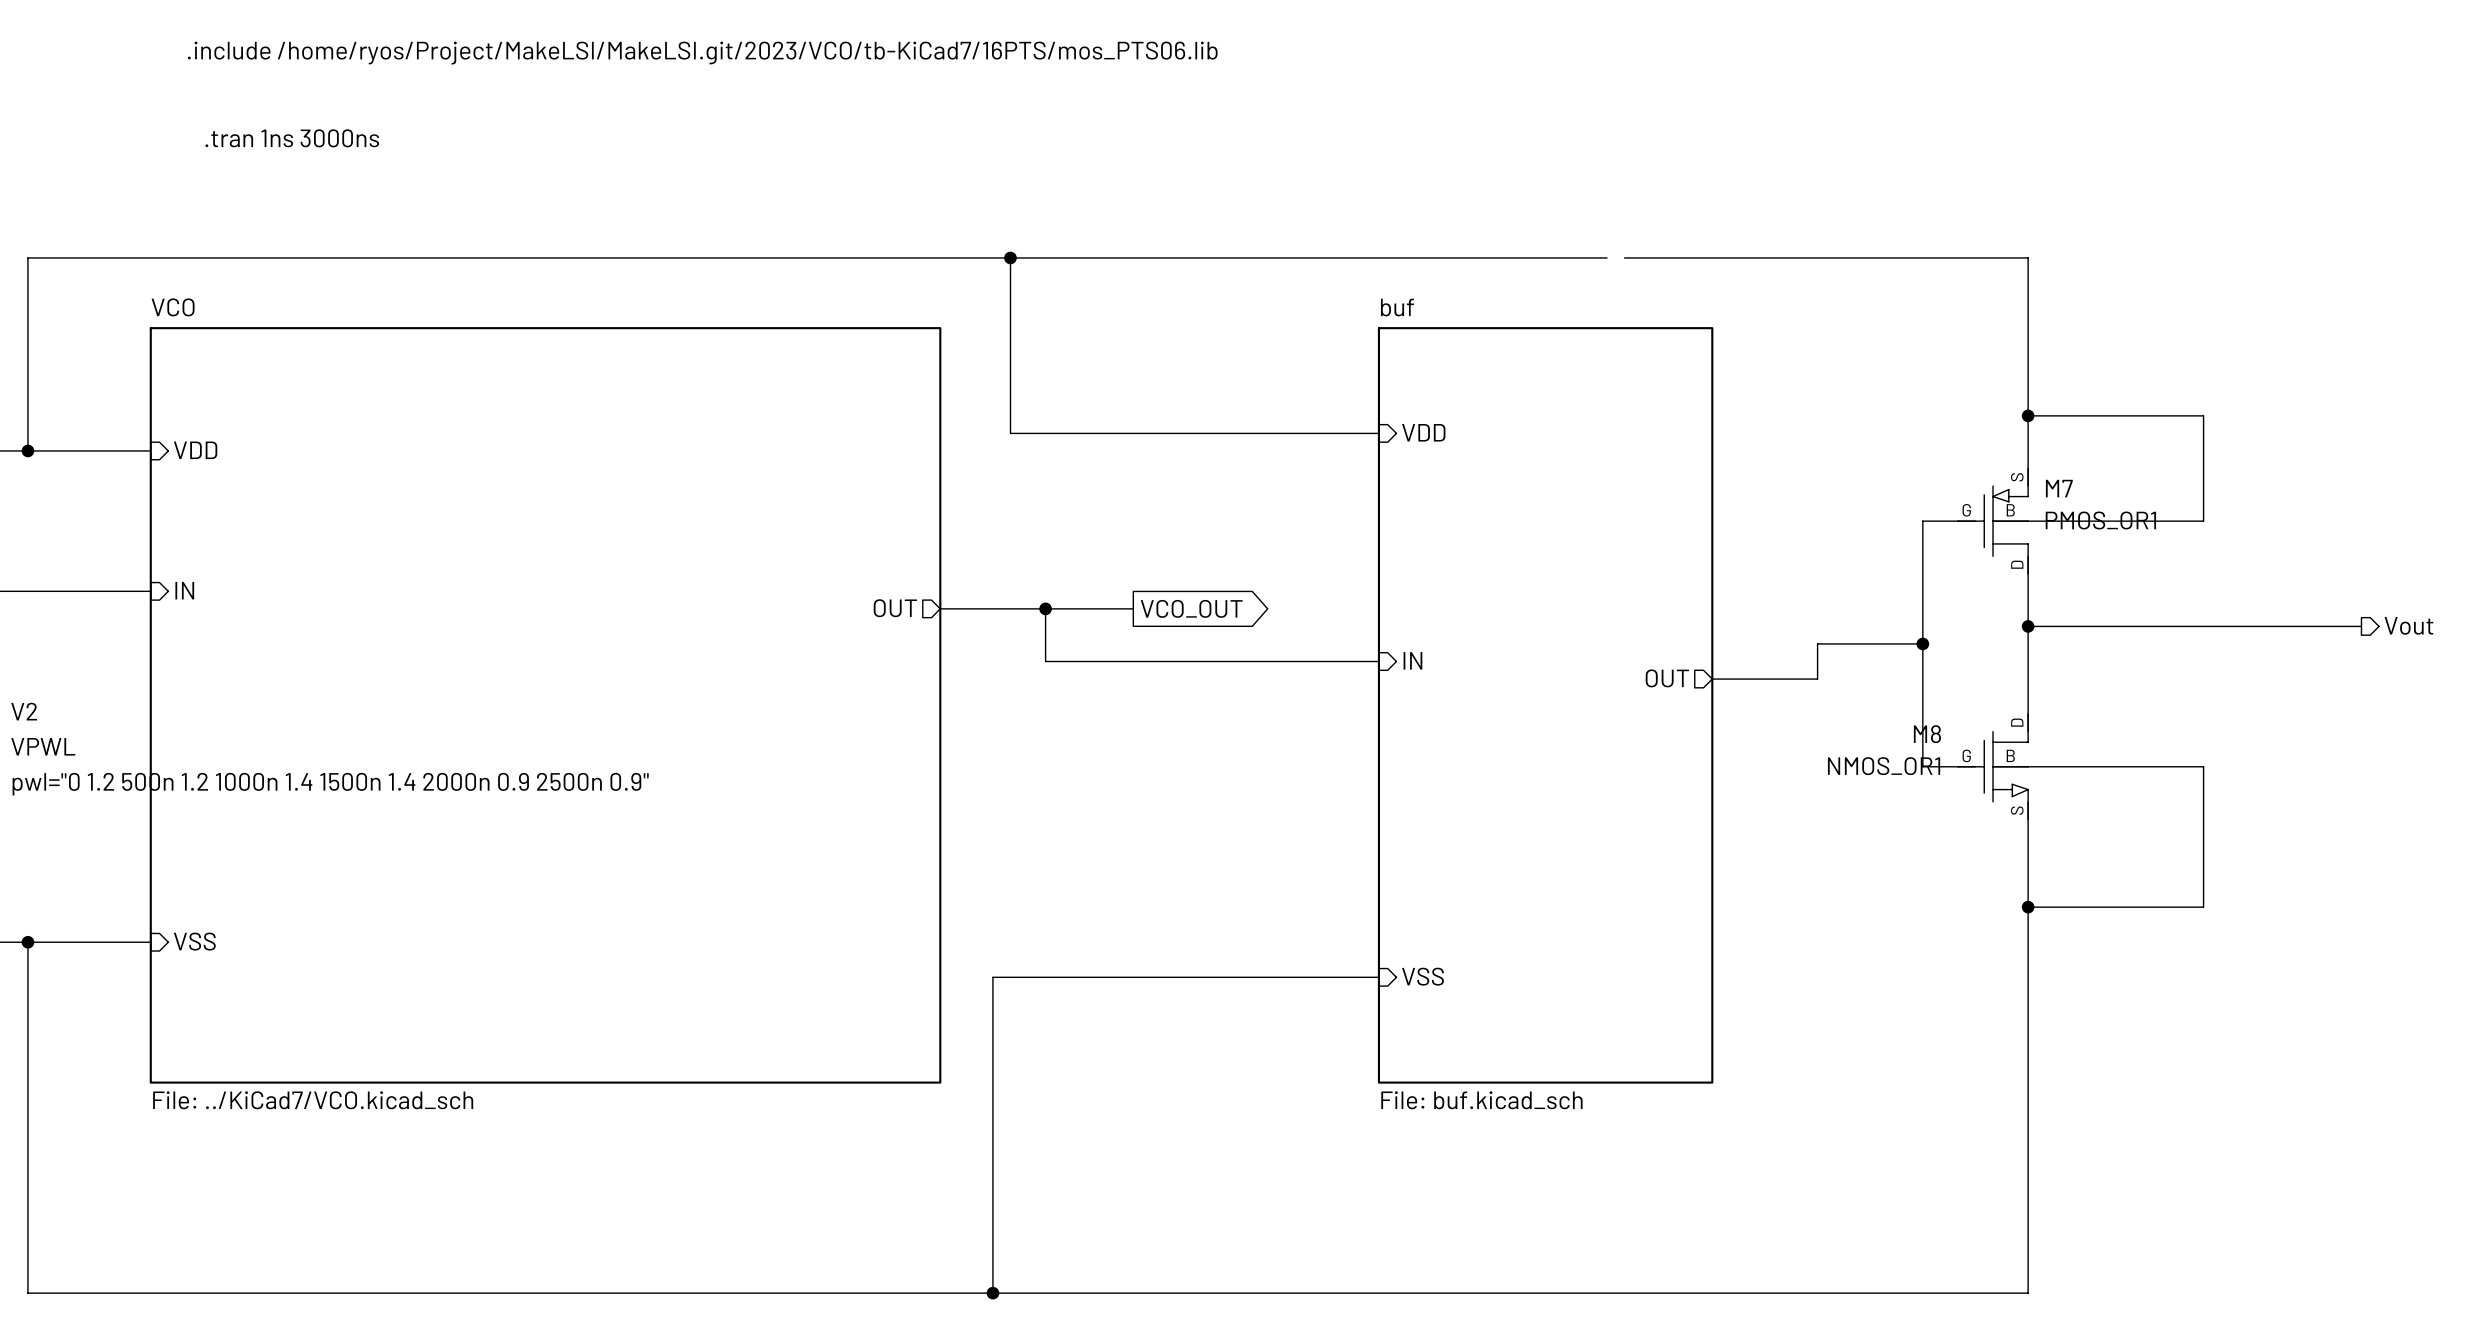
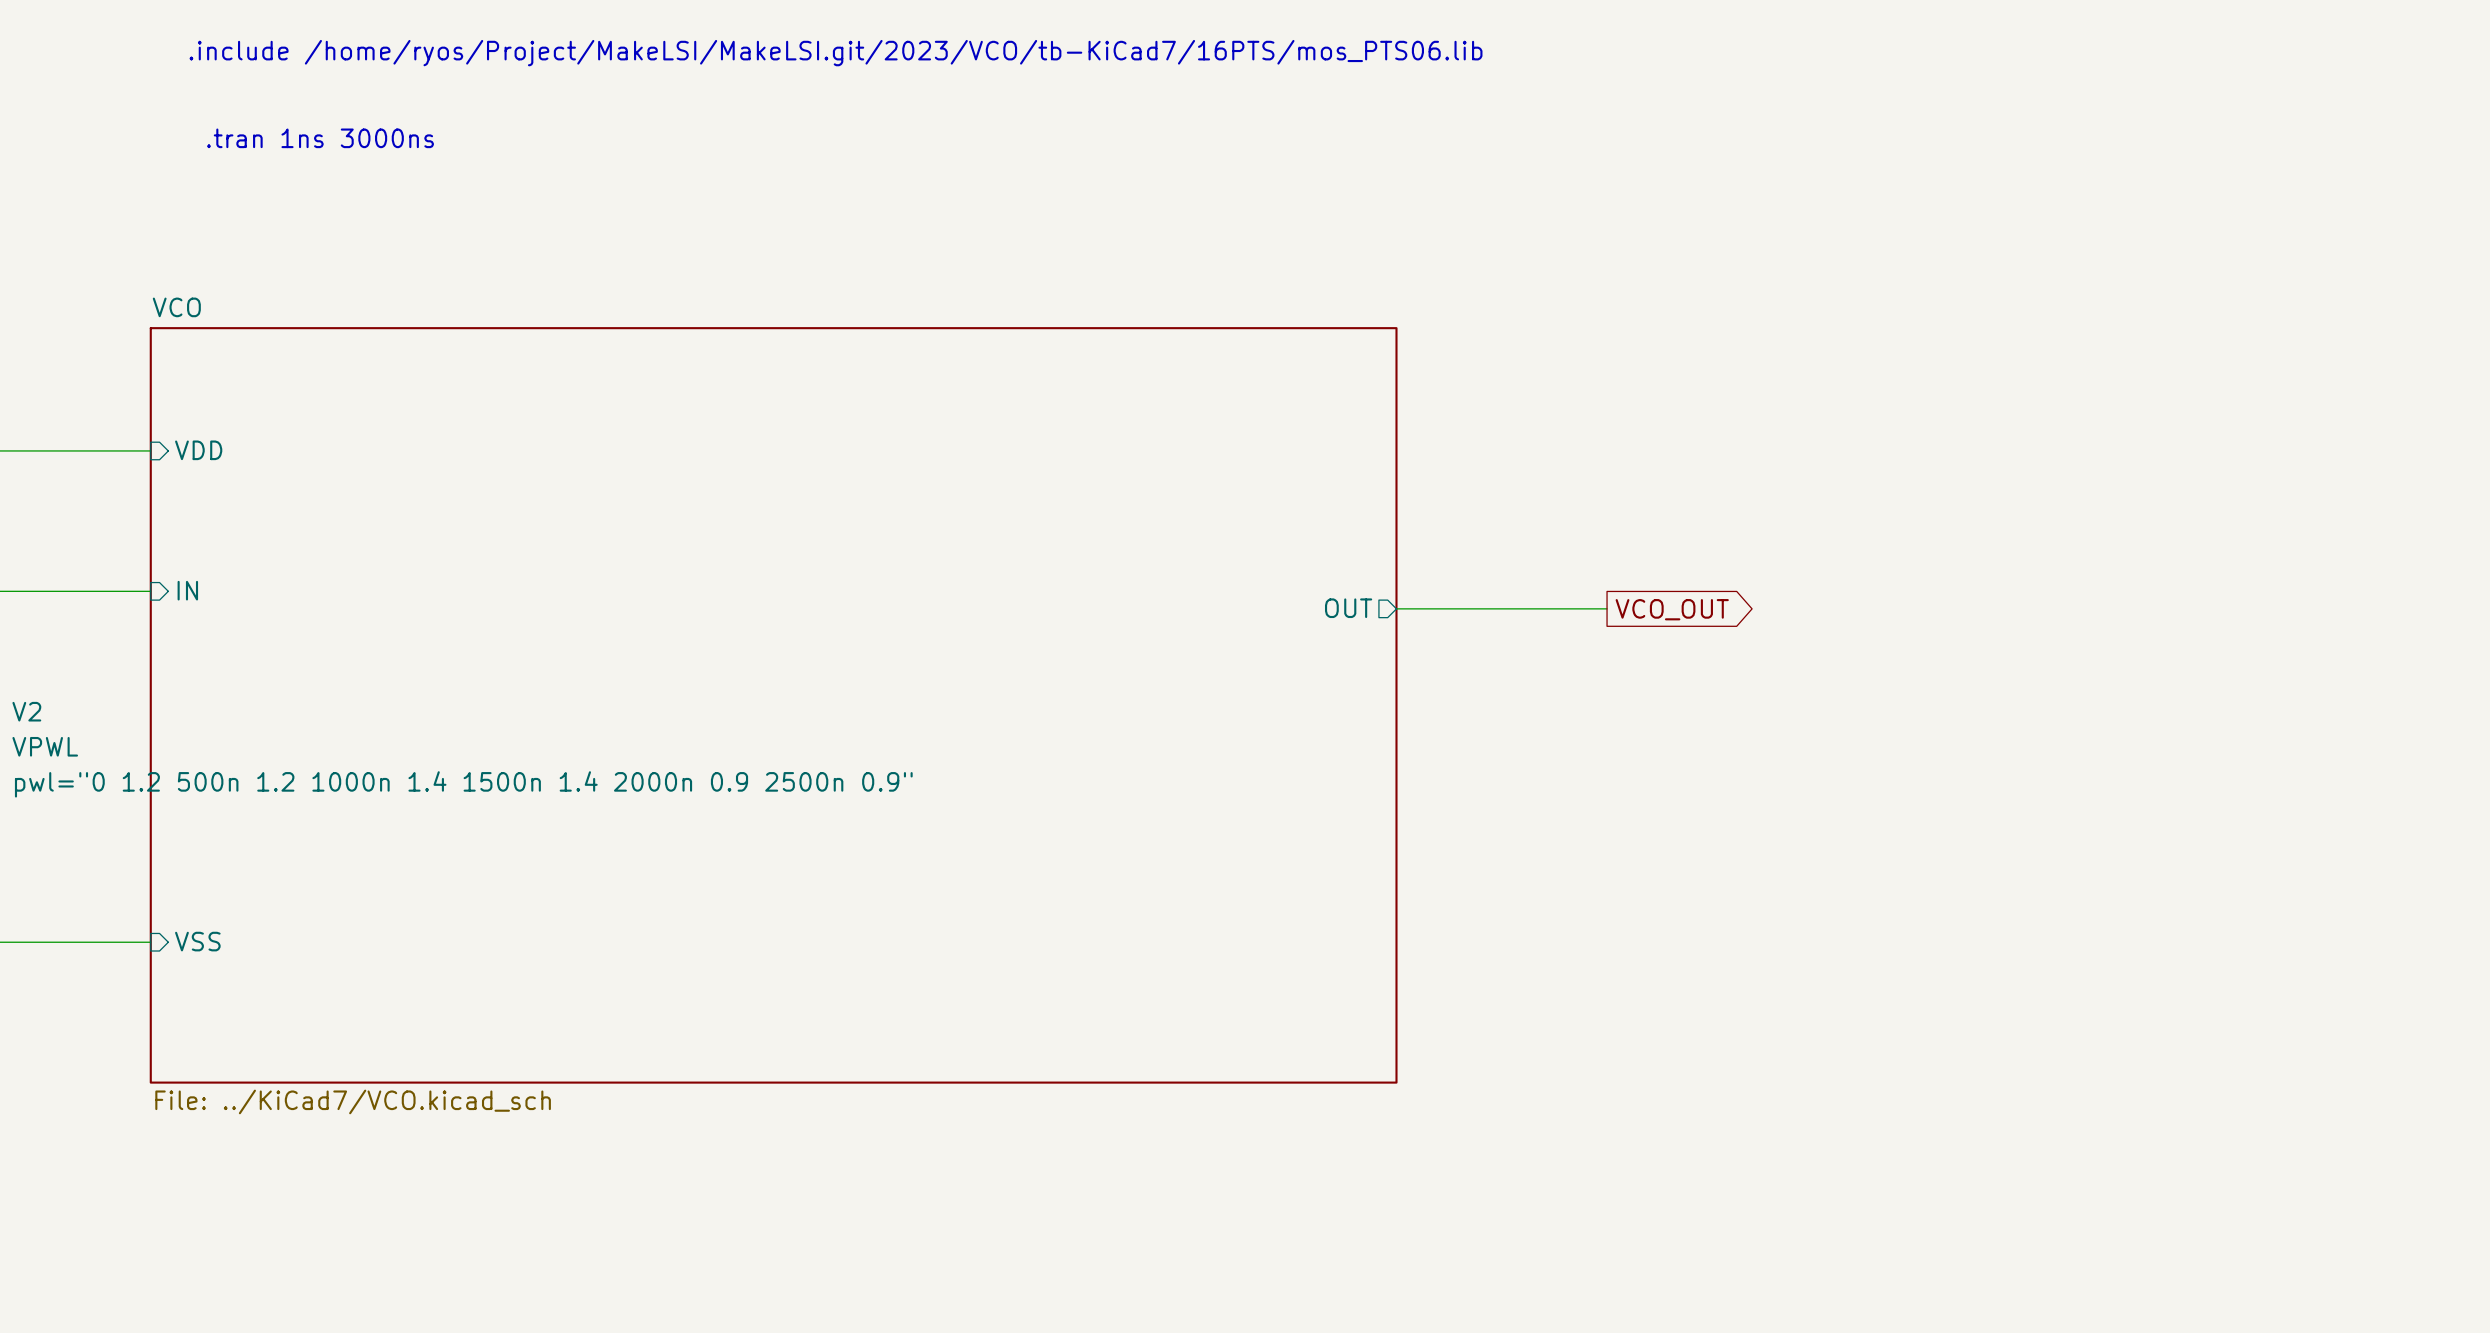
wire: (1010, 257) (1010, 433) (1378, 433) -> none
junction: (1010, 257) -> none
wire: (1607, 257) (27, 257) (27, 450) -> none
wire: (1624, 257) (2028, 257) (2028, 468) -> none
wire: (2028, 415) (2203, 415) (2203, 521) (2028, 521) -> none
junction: (2028, 415) -> none
sheet pin: VDD (1423, 432) -> none
junction: (27, 450) -> none
wire: (1957, 521) (1922, 521) (1922, 766) (1957, 766) -> none
M7: PMOS_OR1 (1993, 521) -> none
wire: (2028, 573) (2028, 714) -> none
sheet pin: OUT (895, 608) -> none
wire: (940, 608) (1133, 608) -> none
wire: (1045, 608) (1045, 661) (1378, 661) -> none
junction: (1045, 608) -> none
global label: VCO_OUT (1191, 608) -> none
sheet pin: none -> OUT (1348, 608)
wire: none -> (1396, 608) (1607, 608)
global label: none -> VCO_OUT (1672, 609)
hierarchical label: Vout (2408, 625) -> none
wire: (2028, 626) (2361, 626) -> none
junction: (2028, 626) -> none
wire: (1922, 643) (1817, 643) (1817, 679) (1712, 679) -> none
junction: (1922, 643) -> none
sheet pin: IN (1412, 660) -> none
sheet pin: OUT (1667, 678) -> none
sheet VCO: File: ../KiCad7/VCO.kicad_sch (545, 705) -> none
sheet VCO: none -> File: ../KiCad7/VCO.kicad_sch (773, 705)
sheet buf: File: buf.kicad_sch (1545, 705) -> none
M8: NMOS_OR1 (1993, 766) -> none
wire: (2028, 766) (2203, 766) (2203, 907) (2028, 907) -> none
wire: (2028, 819) (2028, 1293) (27, 1293) (27, 942) -> none
junction: (2028, 907) -> none
junction: (27, 942) -> none
sheet pin: VSS (1423, 976) -> none
wire: (1378, 977) (992, 977) (992, 1293) -> none
junction: (992, 1293) -> none

